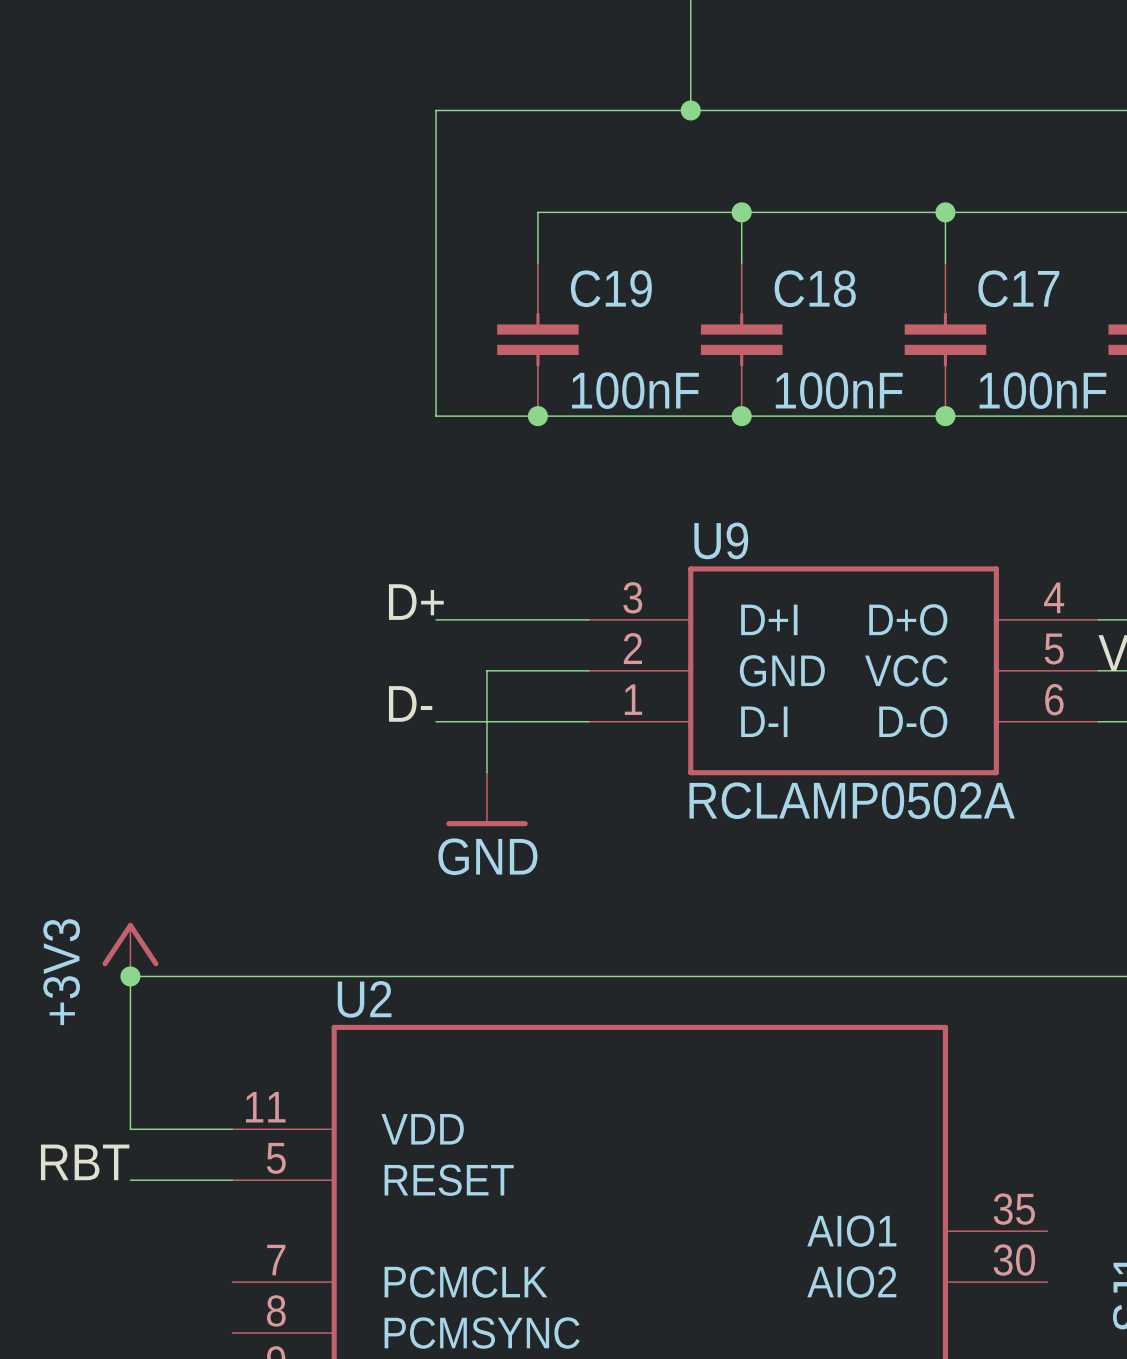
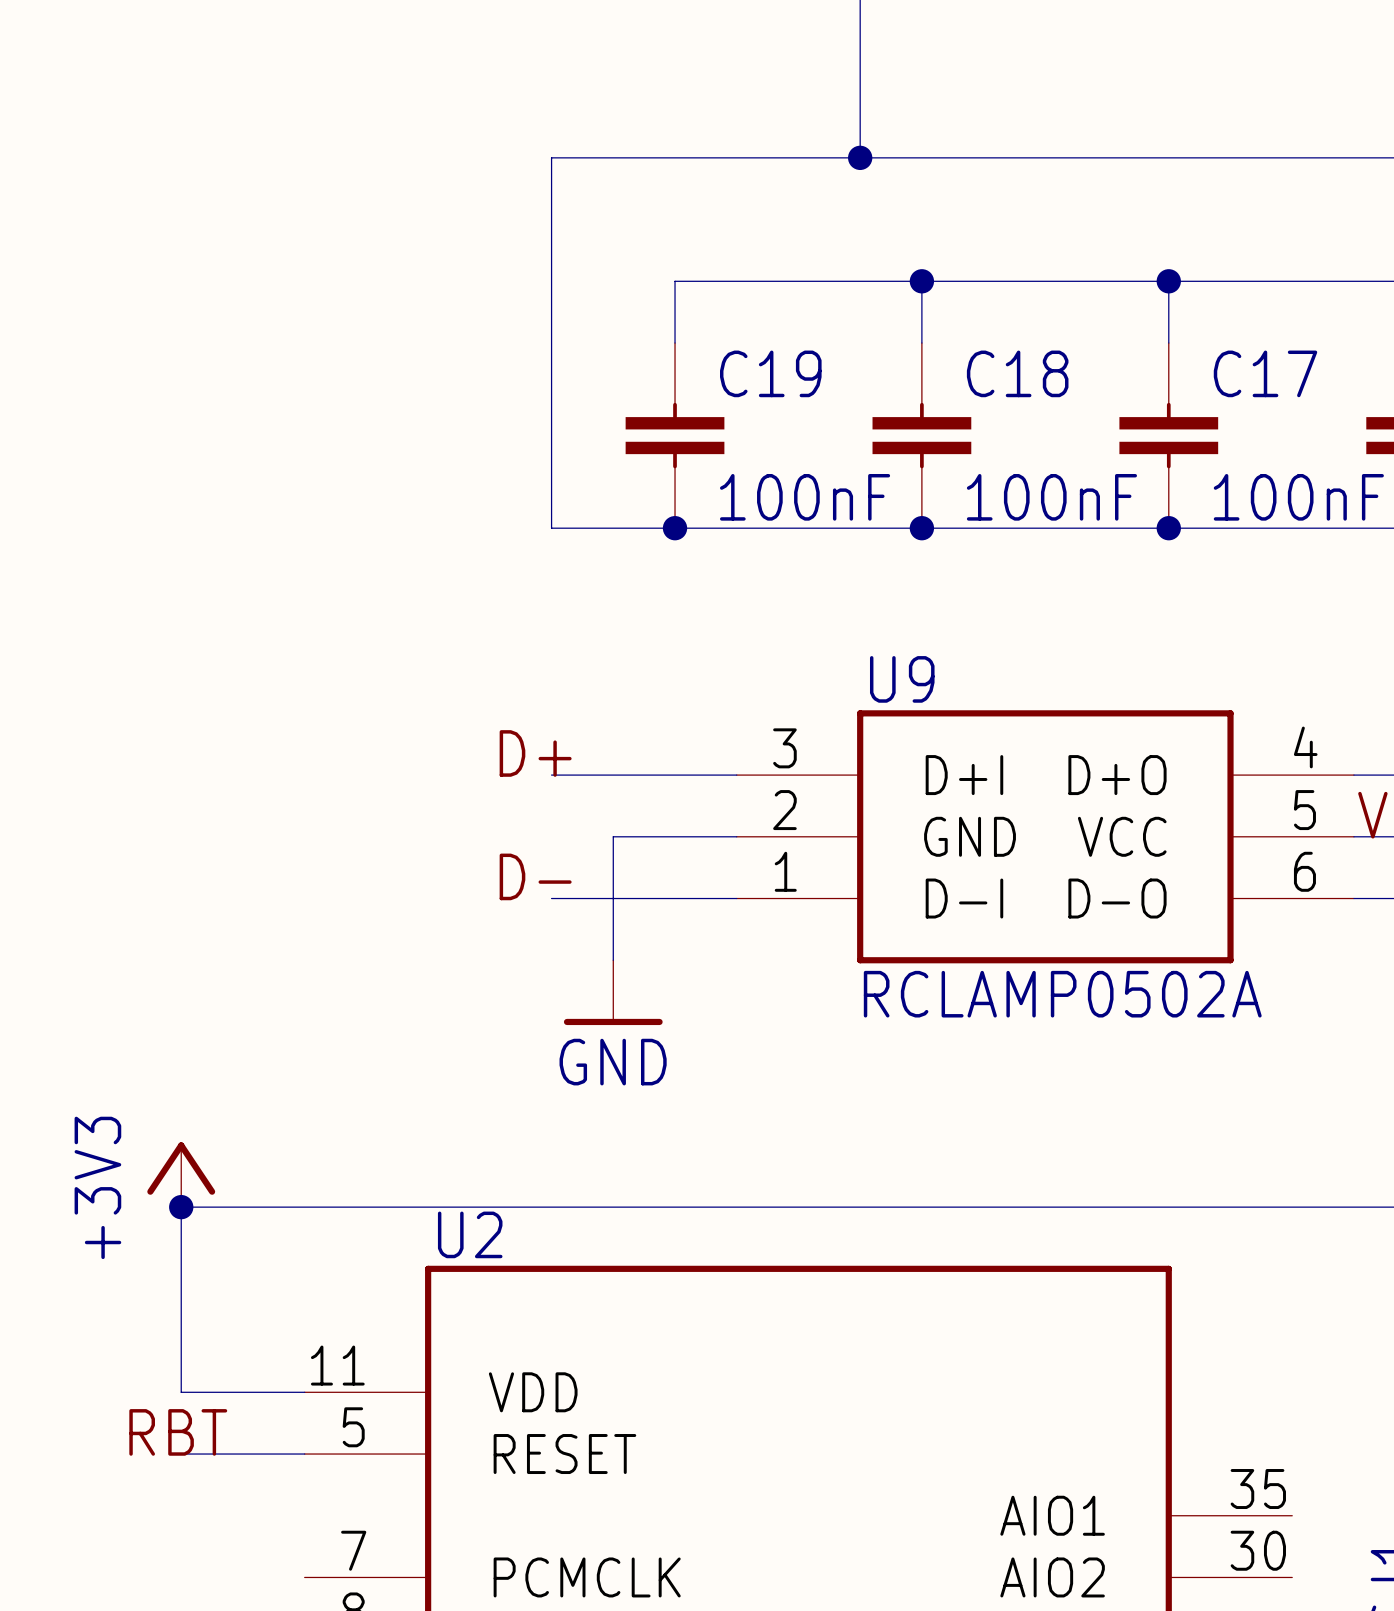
label position: RBT (85, 1162) -> RBT (178, 1432)

